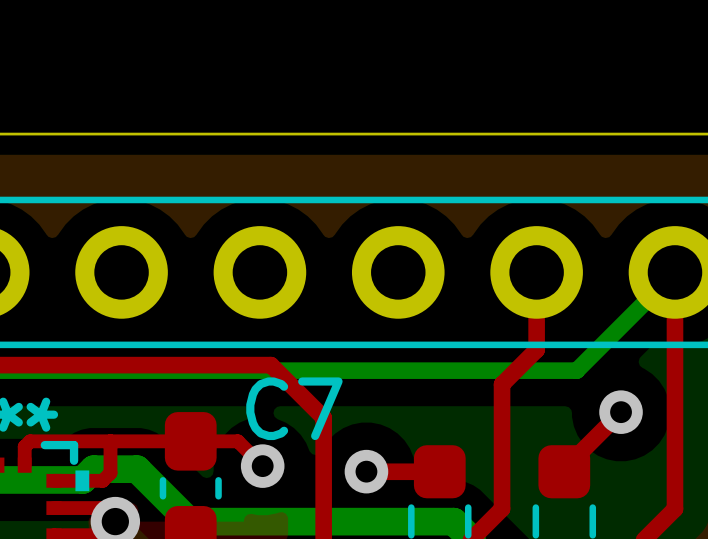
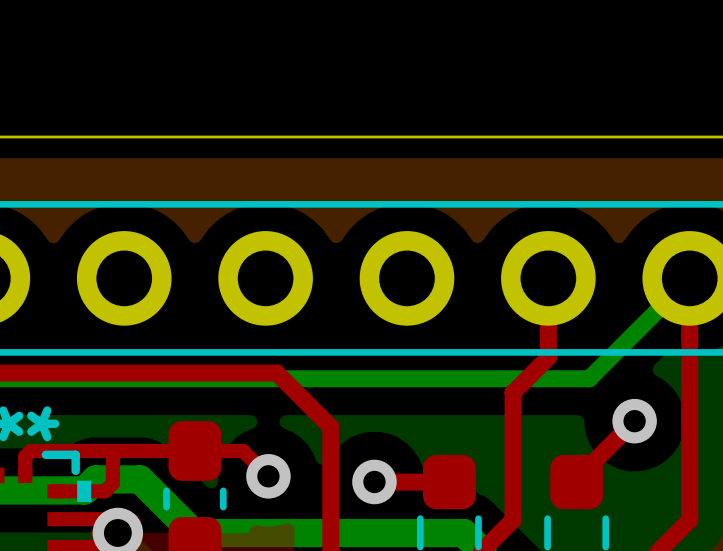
C7 name: C7 (294, 408) -> none

